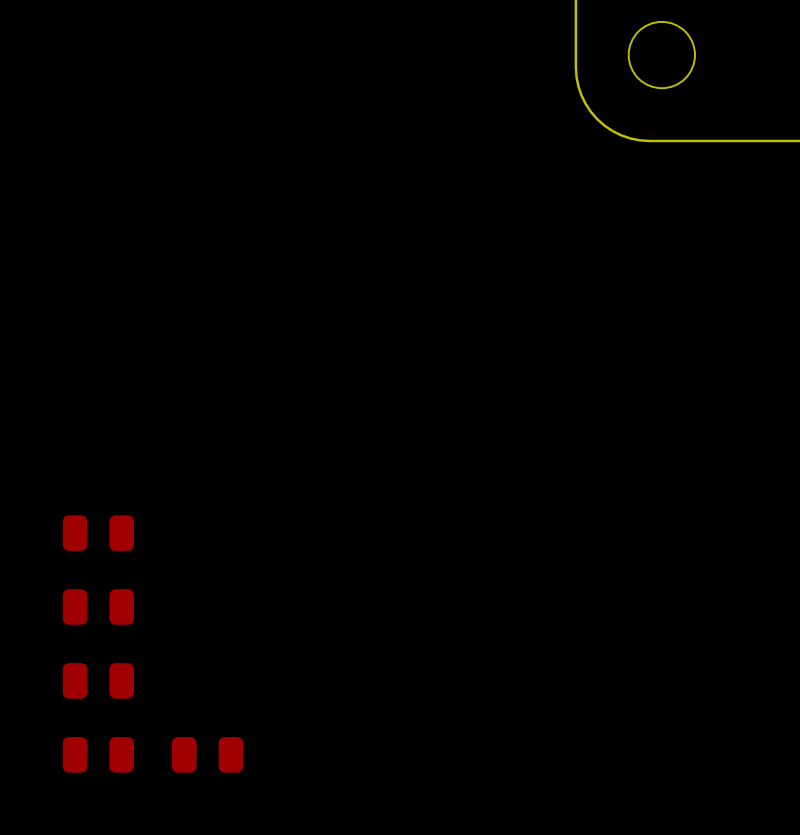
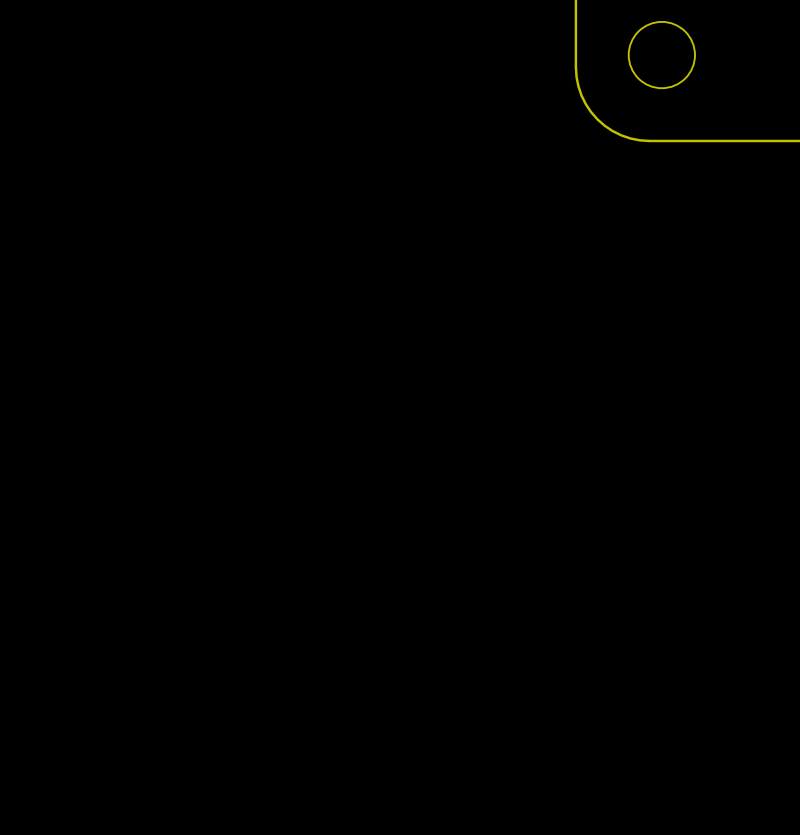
part: (98, 533) -> none
part: (98, 607) -> none
part: (98, 680) -> none
part: (98, 754) -> none
part: (207, 754) -> none

